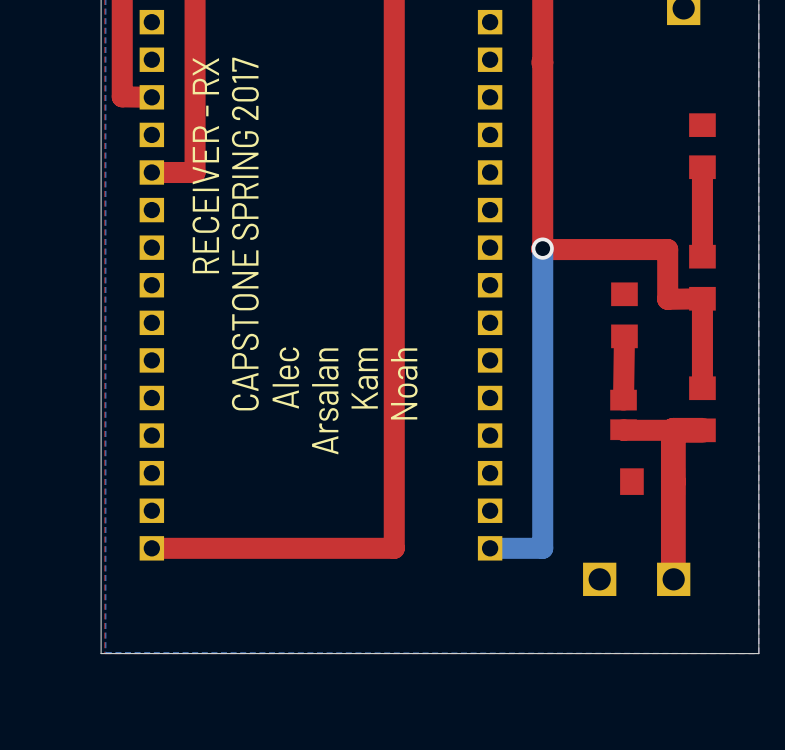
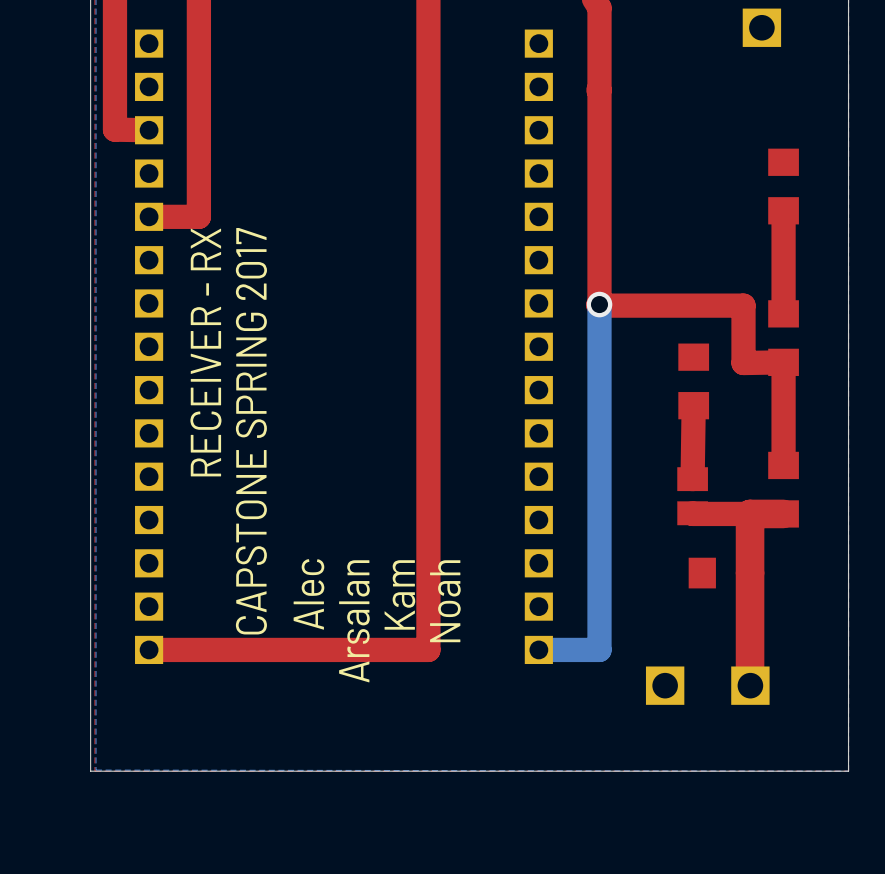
text position: RECEIVER - RX (205, 165) -> RECEIVER - RX (205, 352)
text position: CAPSTONE SPRING 2017 (245, 234) -> CAPSTONE SPRING 2017 (251, 431)
text position: Alec (285, 378) -> Alec (308, 594)
text position: Kam (364, 378) -> Kam (399, 594)
text position: Noah (404, 383) -> Noah (445, 601)
text position: Arsalan (325, 401) -> Arsalan (354, 621)

